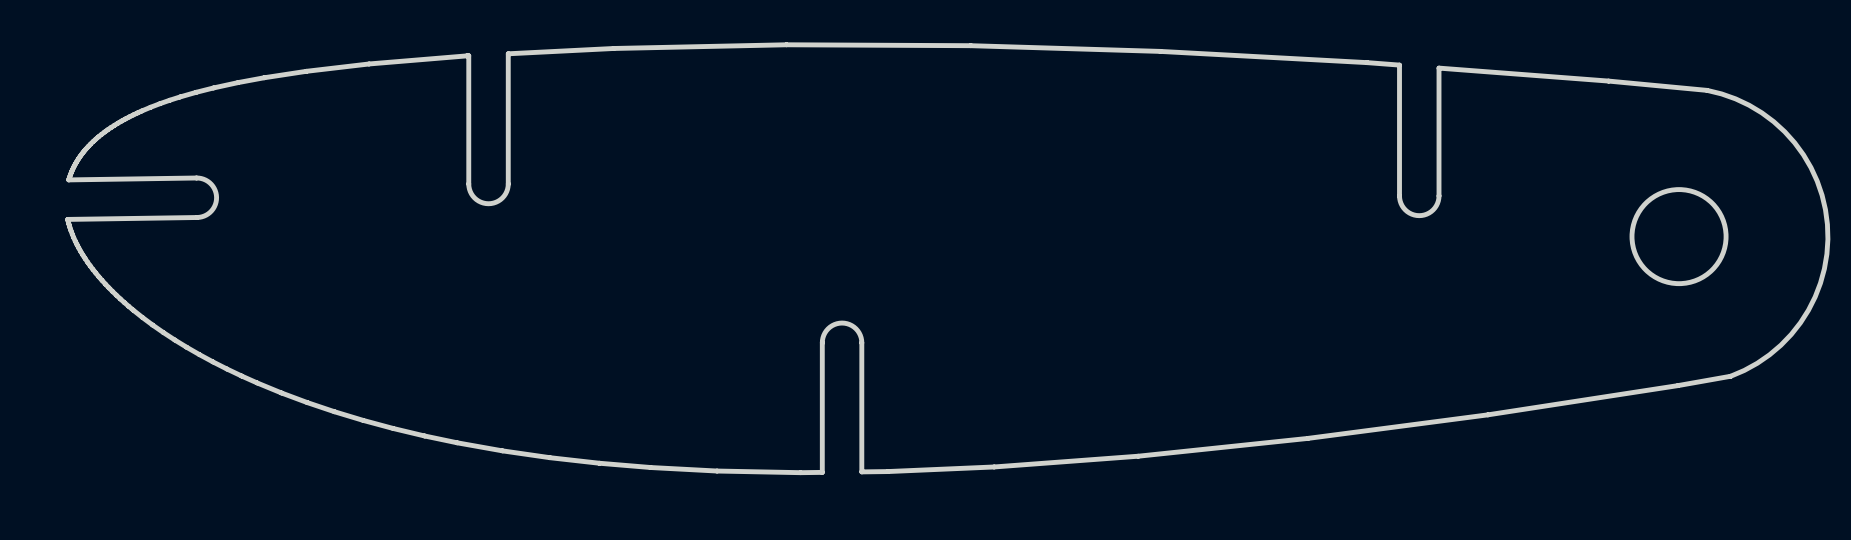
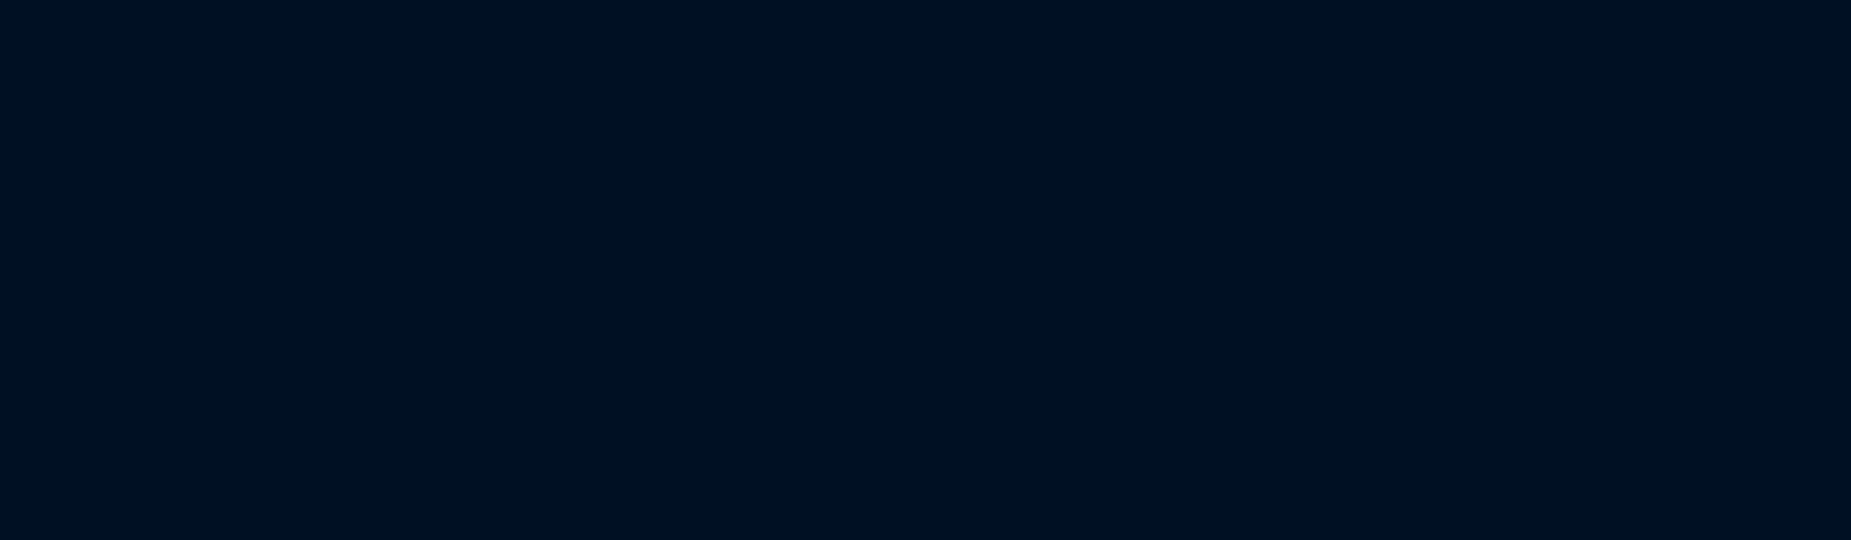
board edge: (68, 179) (196, 178) (203, 179) (211, 184) (215, 192) (216, 202) (210, 212) (201, 216) (67, 219) (75, 241) (87, 262) (105, 284) (124, 302) (174, 339) (241, 376) (281, 392) (334, 411) (393, 428) (457, 442) (549, 457) (599, 463) (717, 471) (822, 472) (822, 340) (826, 330) (836, 323) (844, 323) (854, 327) (859, 332) (861, 340) (861, 471) (994, 466) (1138, 456) (1307, 438) (1487, 414) (1730, 376) (1769, 354) (1800, 322) (1820, 283) (1827, 239) (1822, 195) (1803, 154) (1773, 121) (1749, 105) (1721, 93) (1707, 90) (1608, 81) (1439, 68) (1438, 198) (1436, 205) (1431, 211) (1424, 214) (1416, 215) (1405, 209) (1399, 198) (1399, 65) (1160, 51) (970, 45) (786, 44) (613, 48) (508, 53) (508, 186) (505, 193) (500, 199) (488, 203) (476, 199) (471, 193) (468, 186) (468, 55) (306, 71) (213, 87) (169, 100) (137, 112) (111, 127) (93, 141) (77, 159) (68, 179) -> none
round board edge: [1629, 187, 1729, 287] -> none

